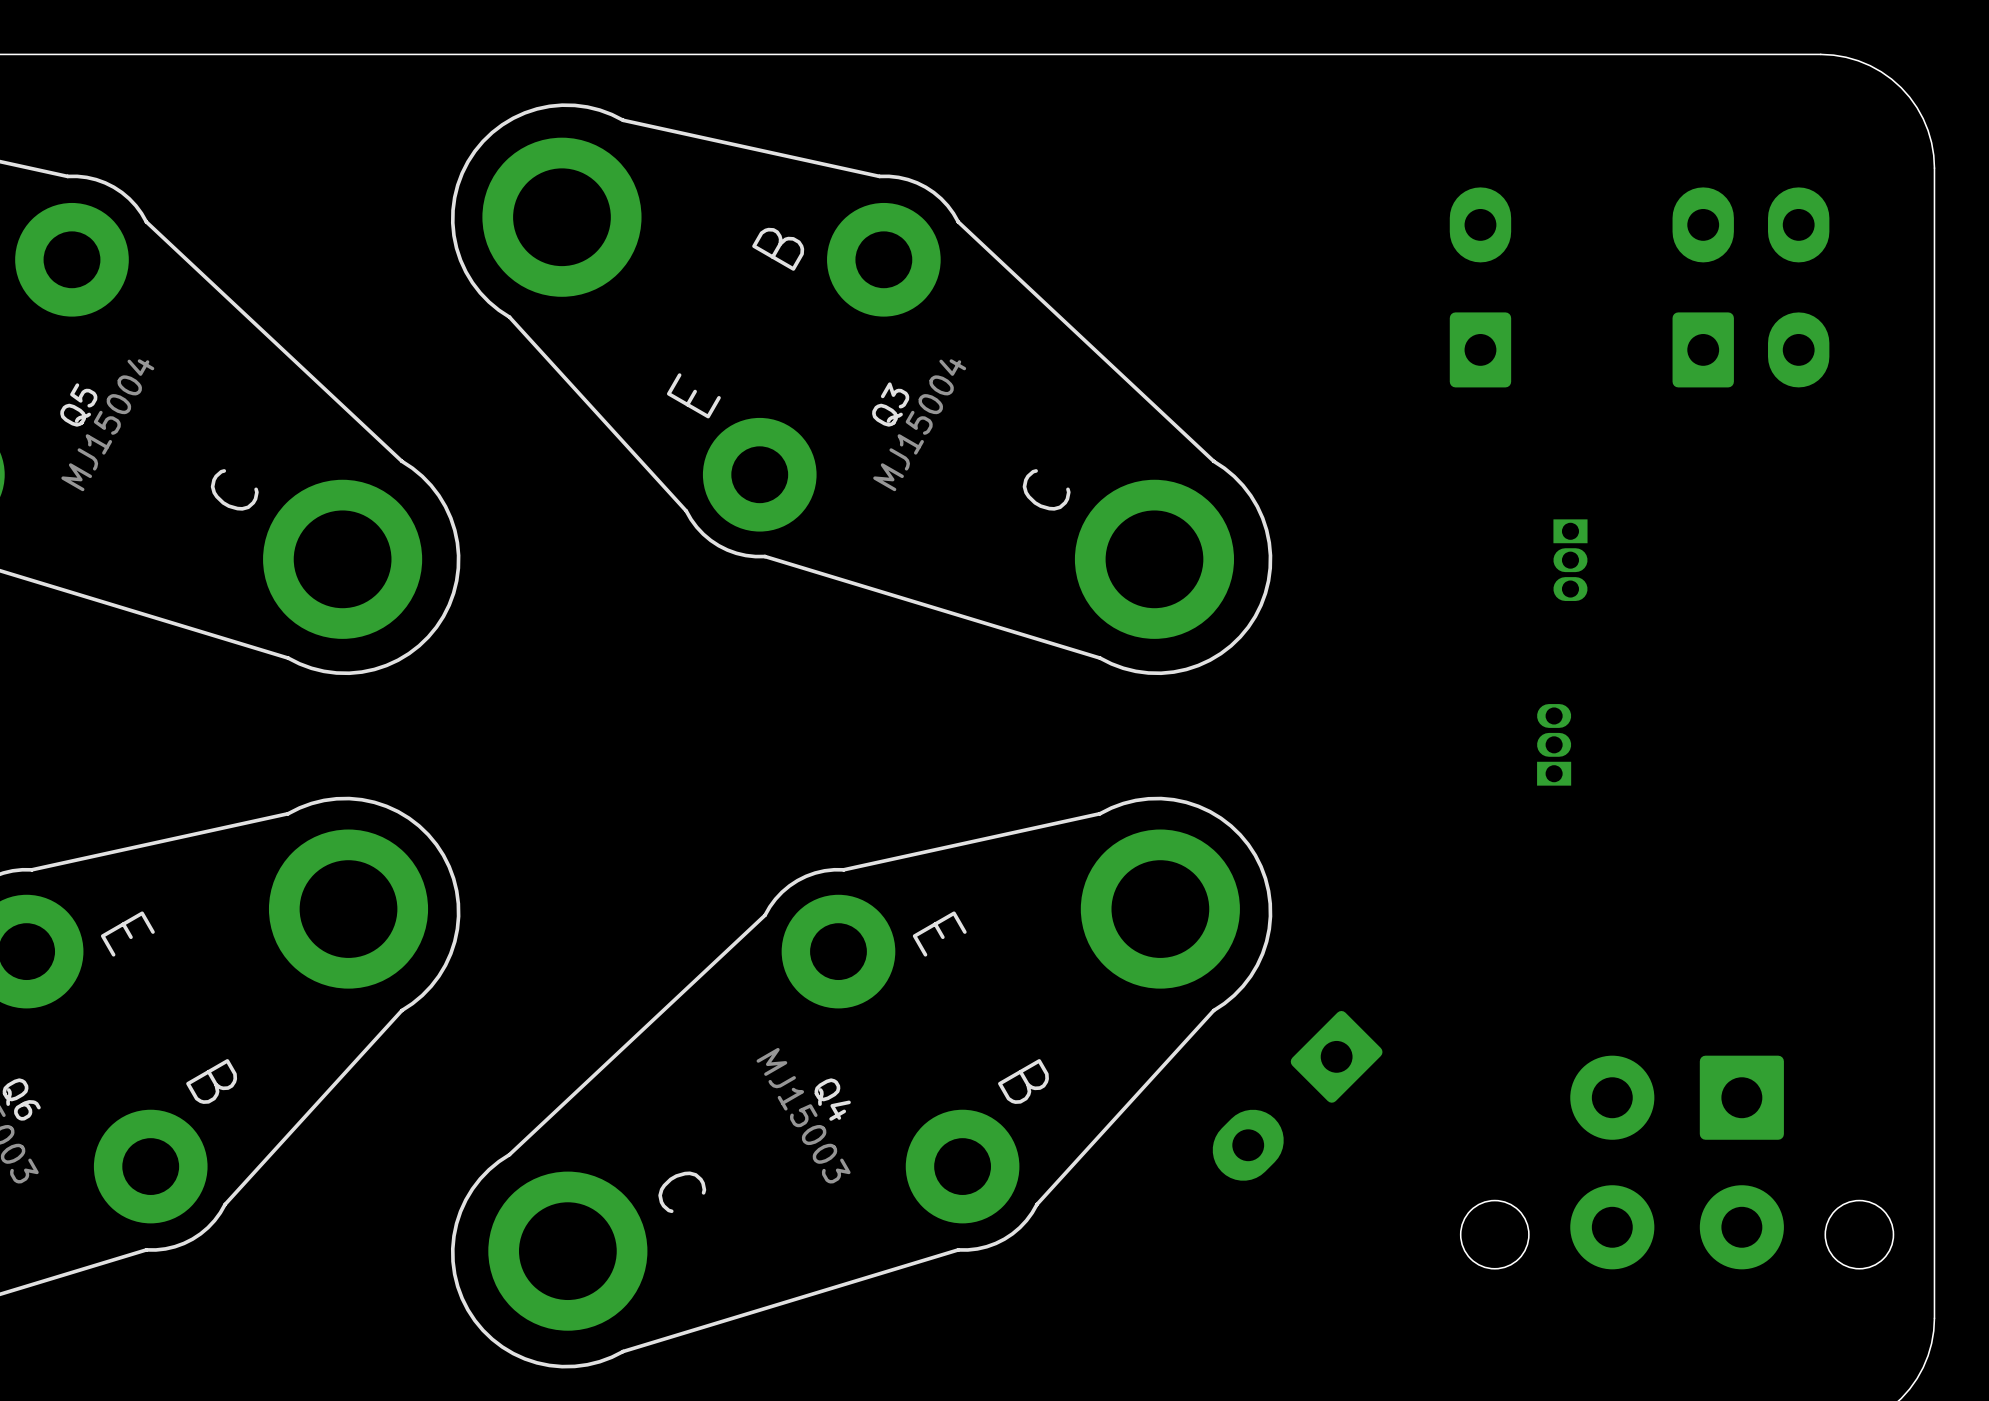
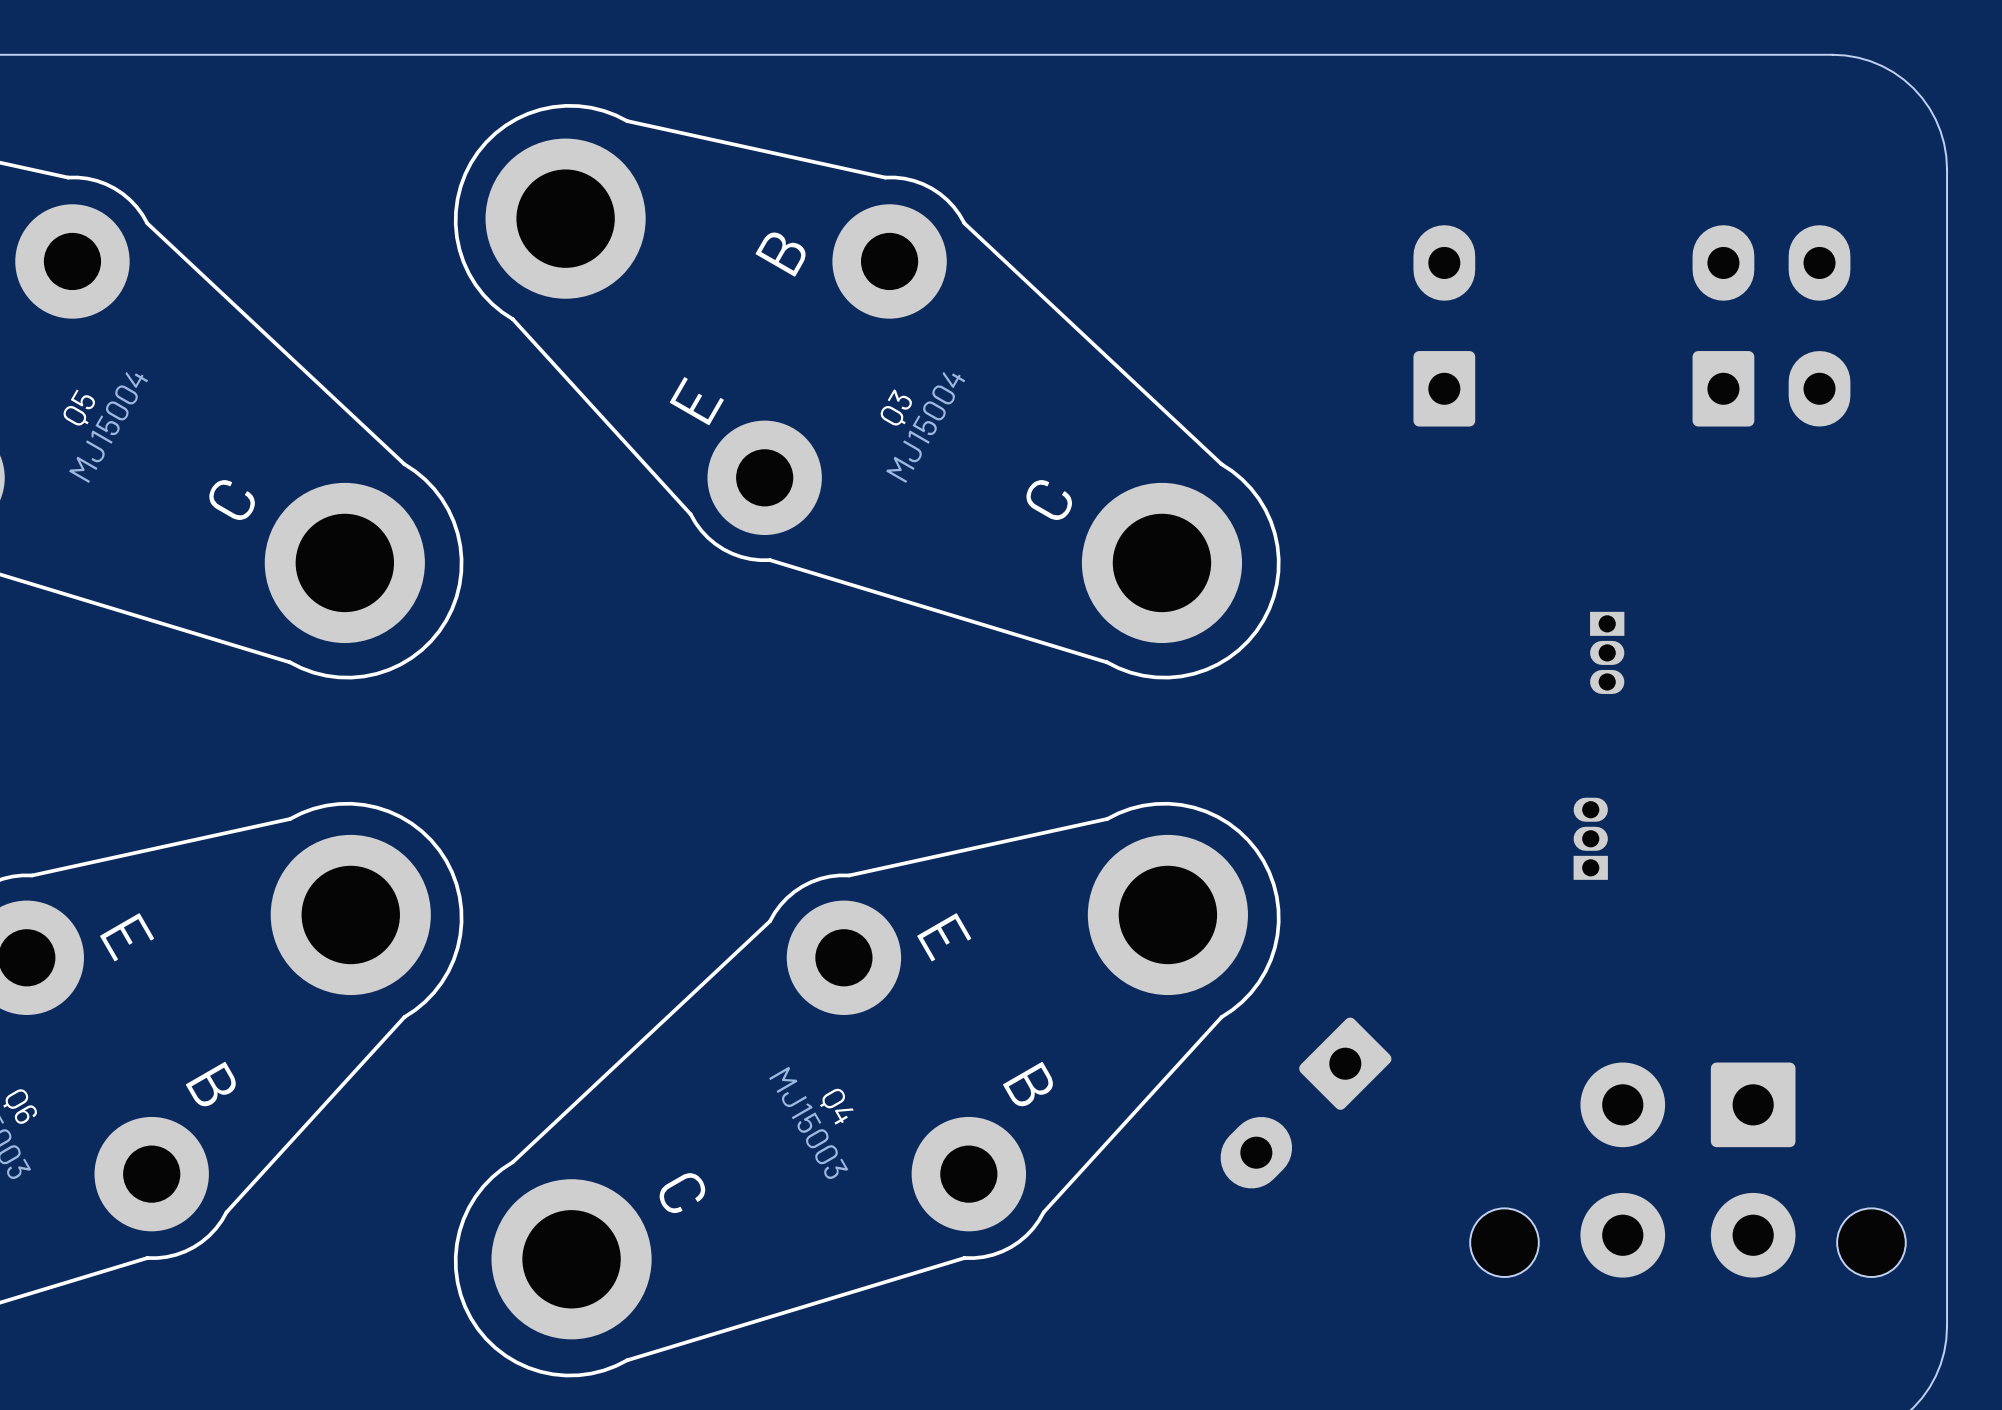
part position: (1480, 287) -> (1444, 325)
part position: (1750, 287) -> (1771, 325)
part: (1570, 560) -> none
part: none -> (1607, 652)
part: (1554, 744) -> none
part: none -> (1590, 838)

